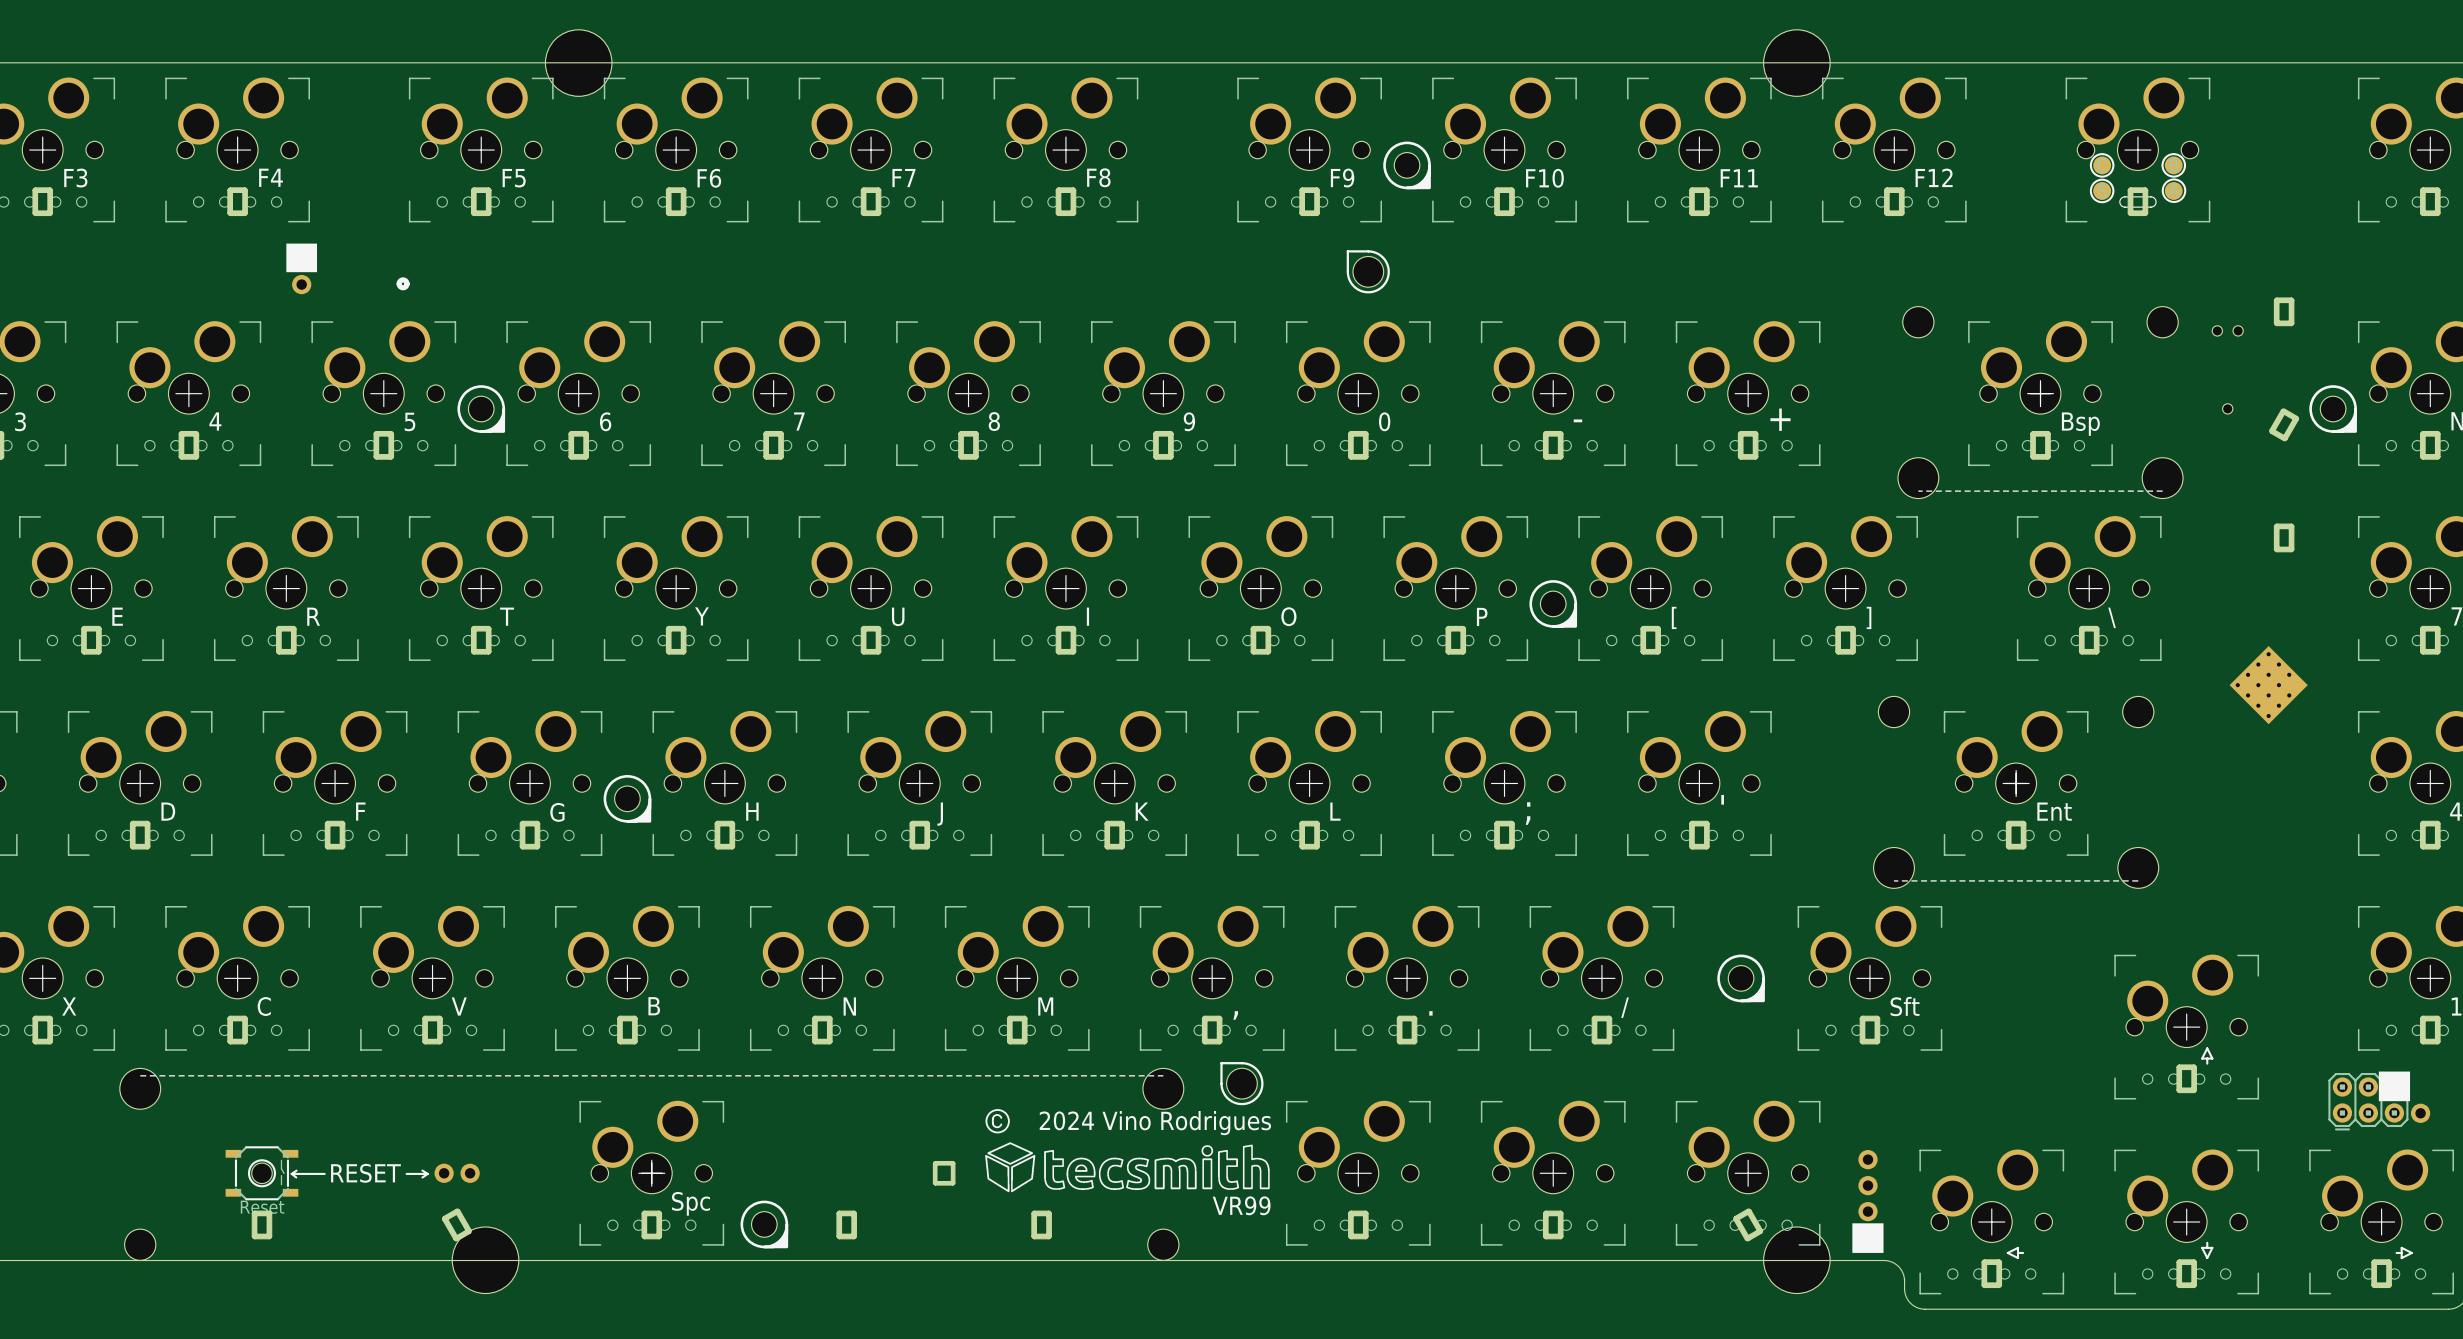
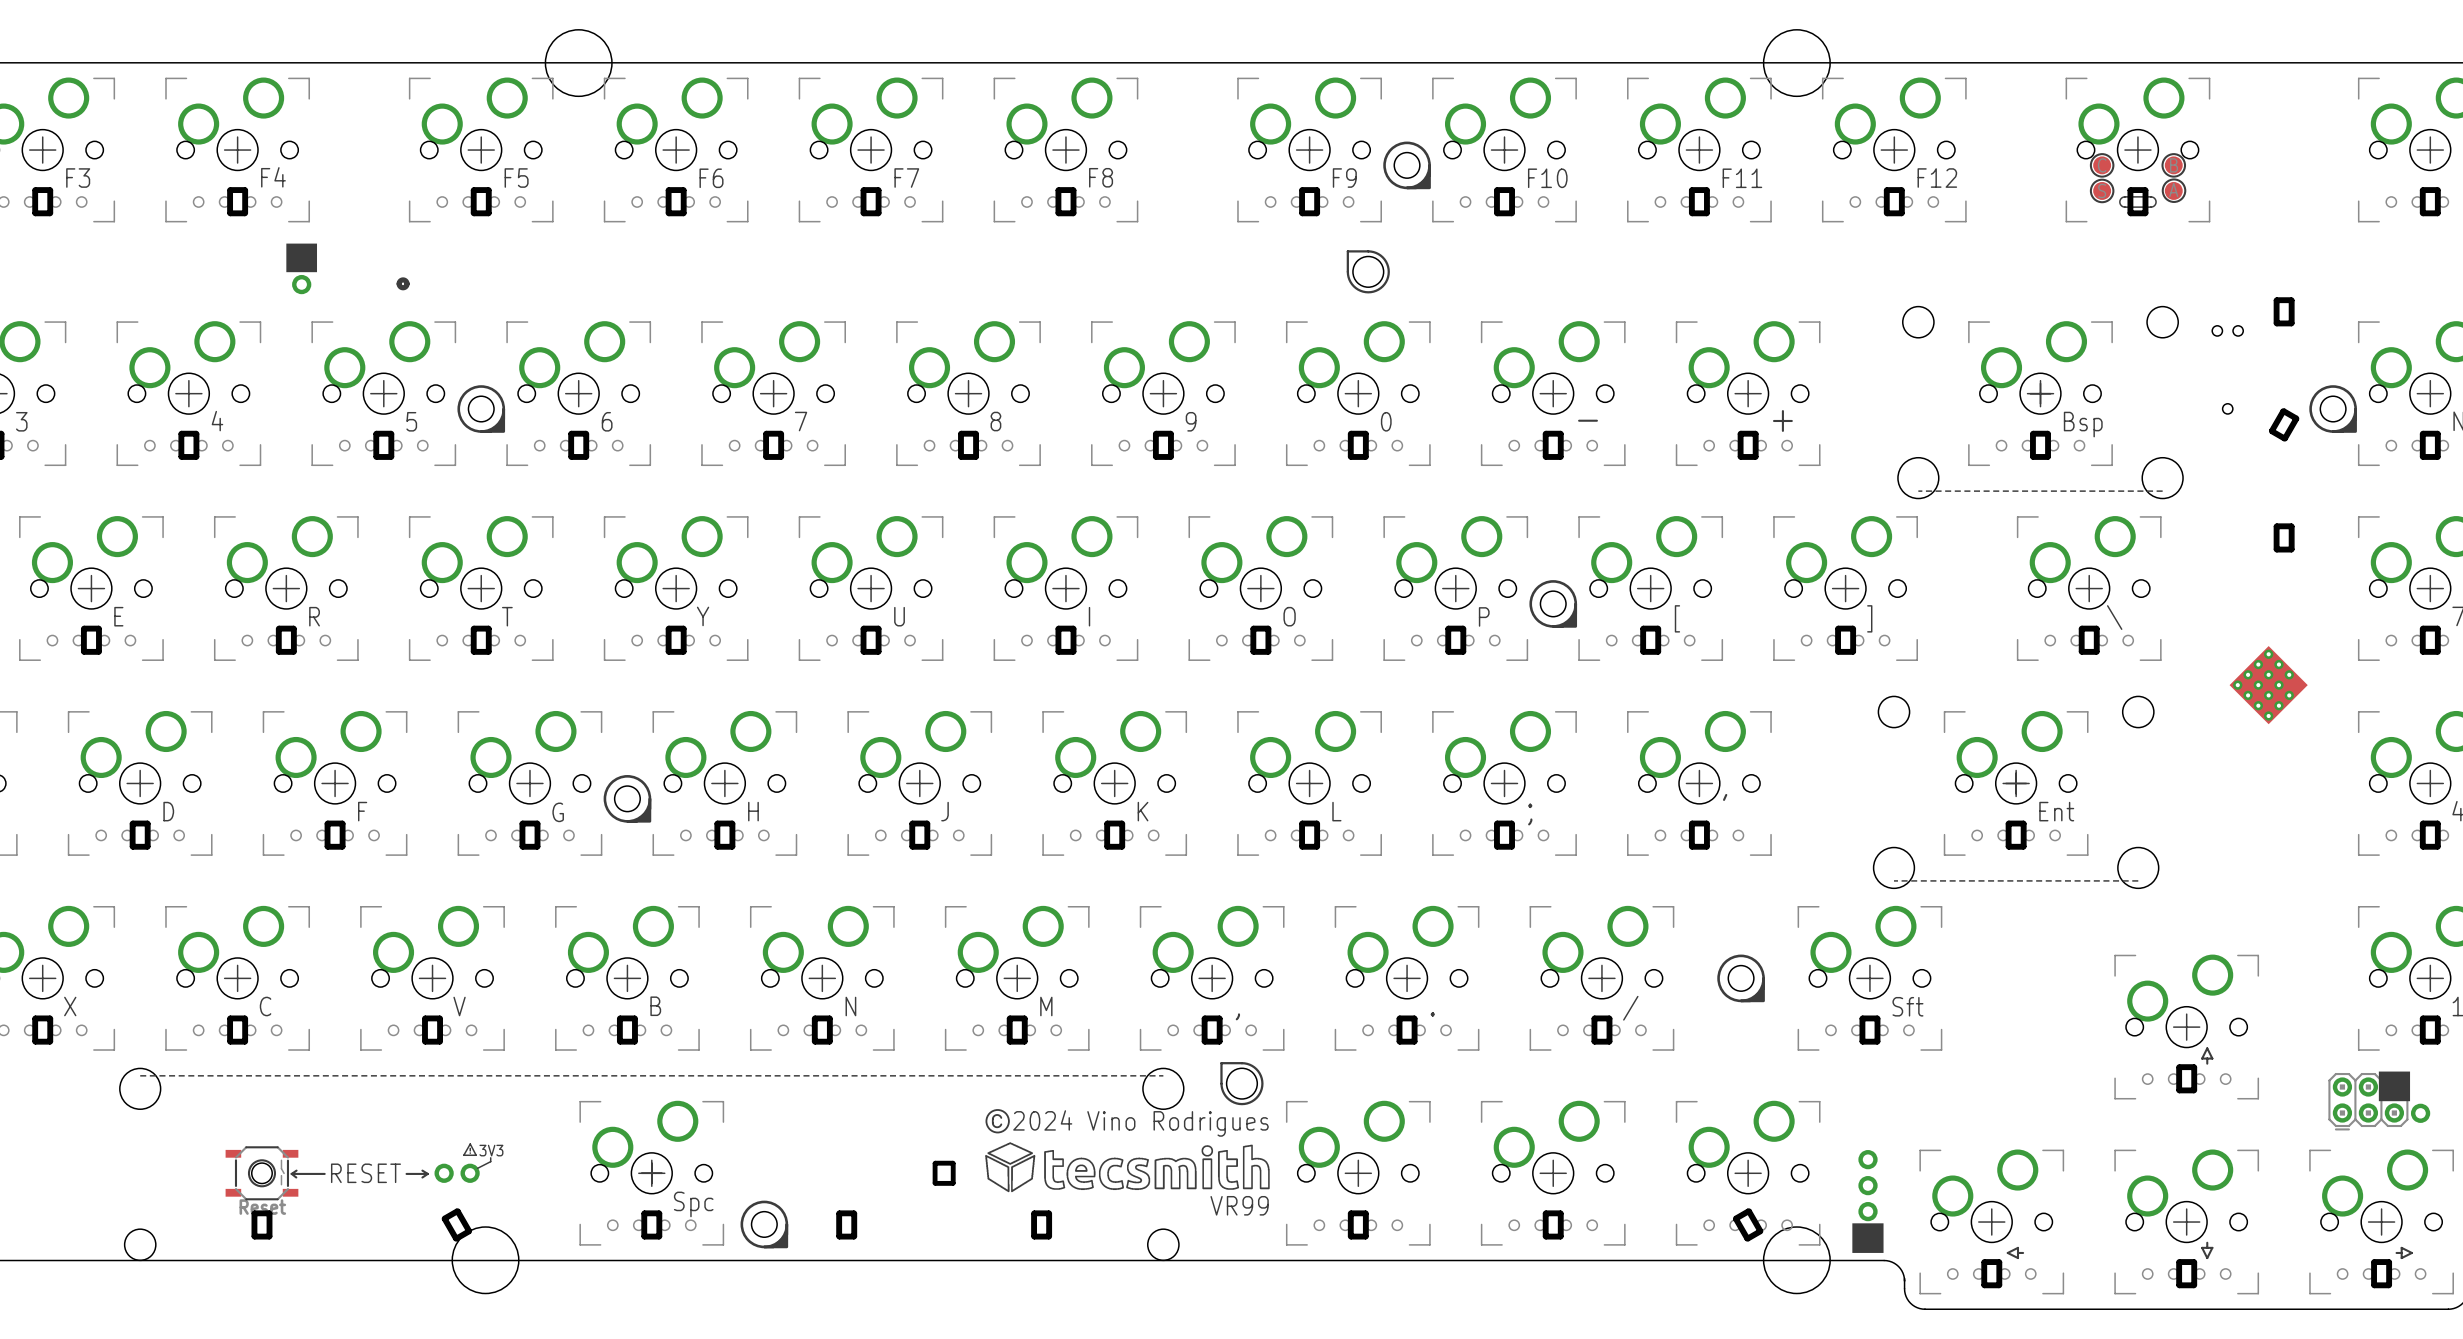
line: none -> (470, 1144) (476, 1155) (463, 1155) (470, 1144)
line: none -> (470, 1148) (470, 1150)
text: none -> 3V3 (491, 1150)
line: none -> (470, 1152) (470, 1153)
line: none -> (490, 1157) (490, 1161) (477, 1168)

